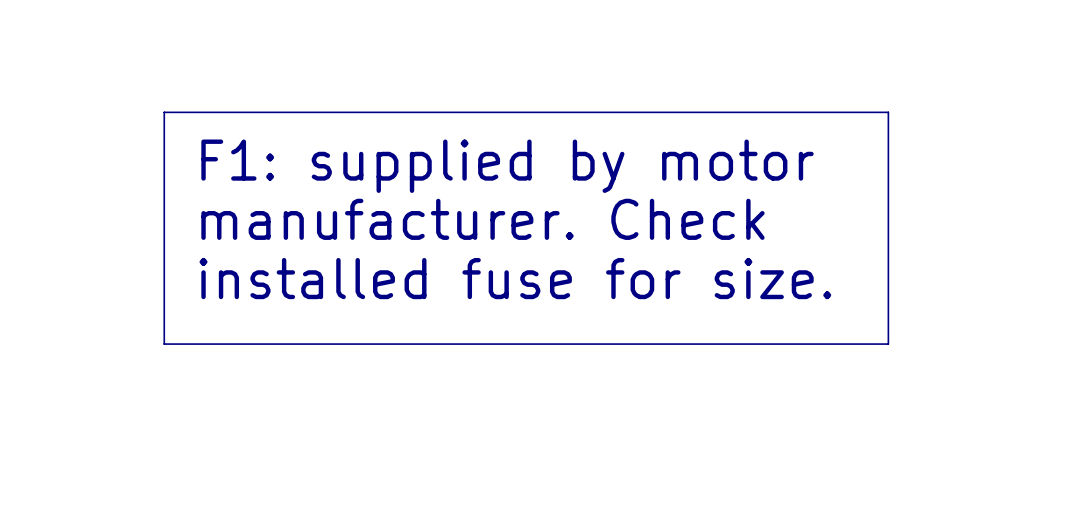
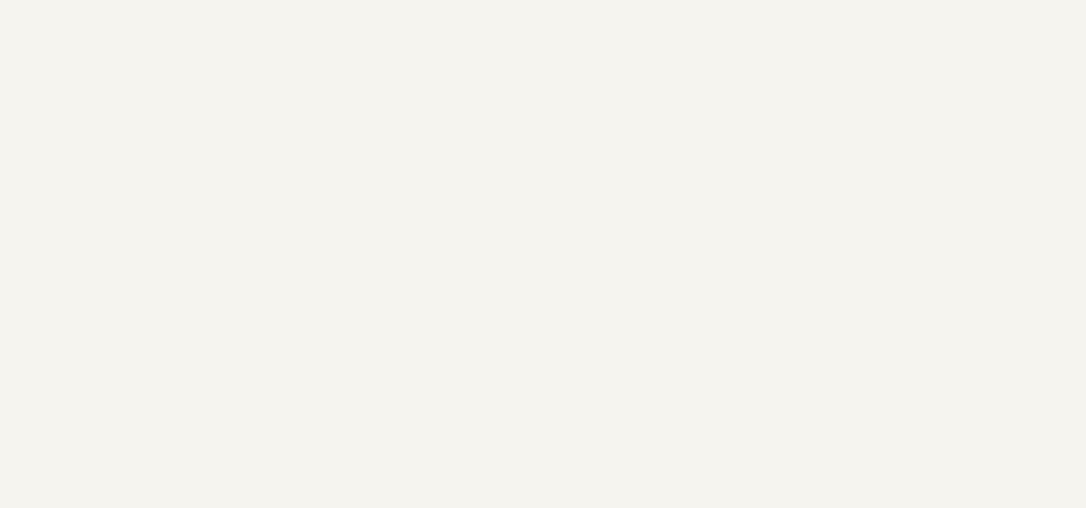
line: (164, 112) (888, 112) (888, 344) (164, 344) (164, 112) -> none
text: F1: supplied by motor (507, 166) -> none
text: manufacturer. Check (482, 219) -> none
text: installed fuse for size. (515, 278) -> none

